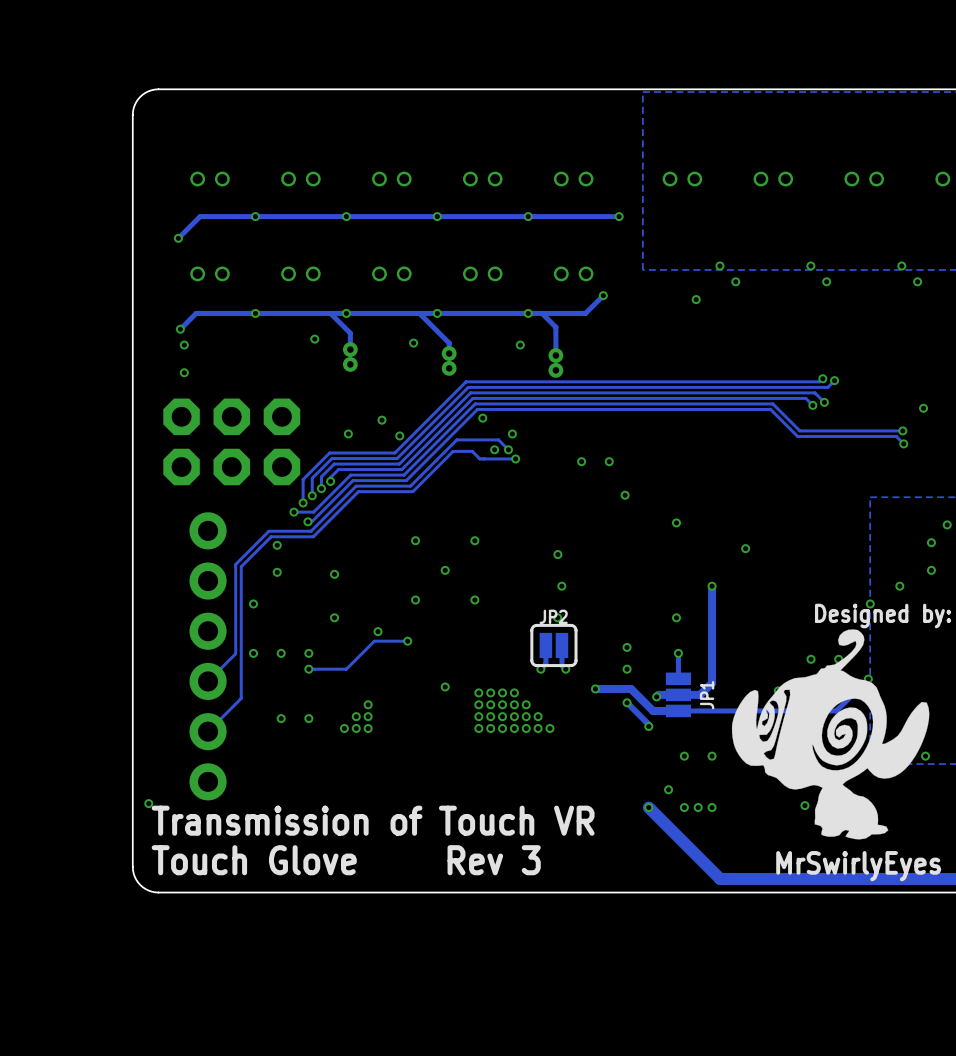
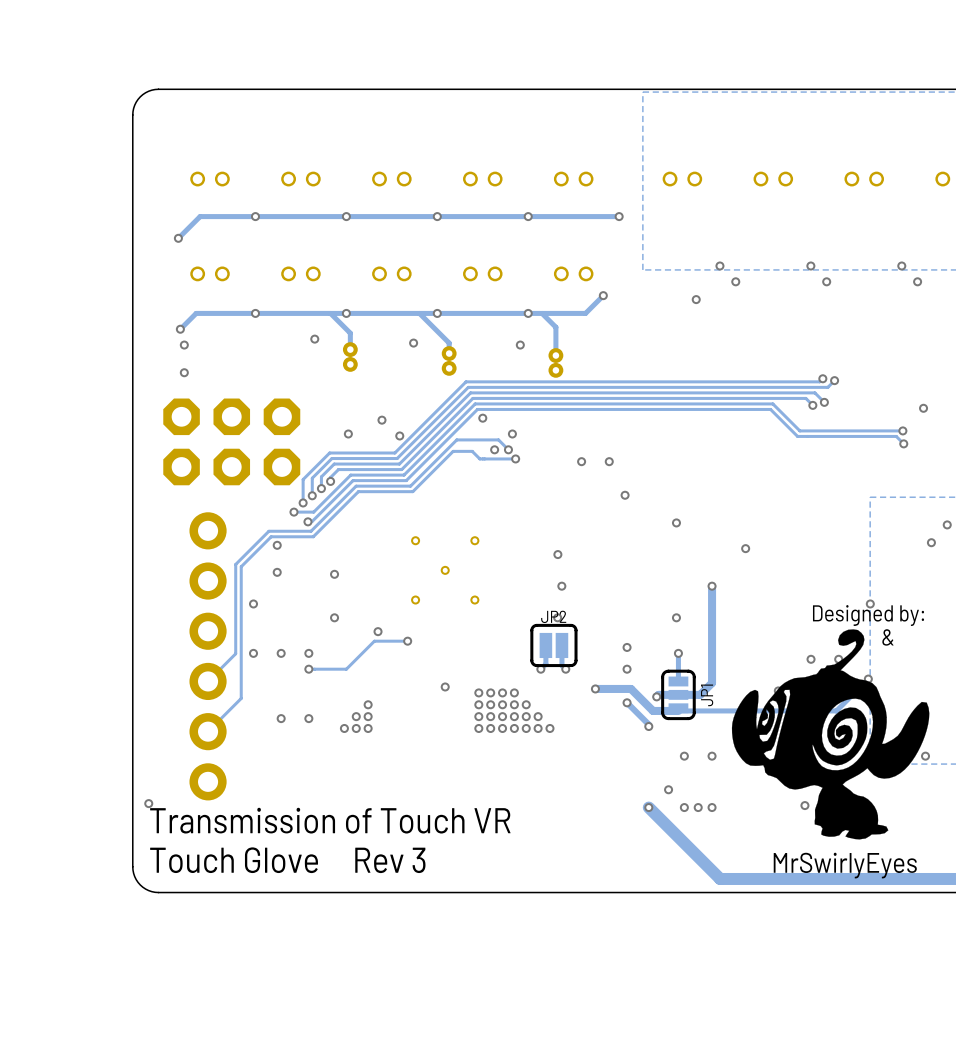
via: (931, 570) -> none
via: (899, 586) -> none
JP1 footprint: [665, 672, 692, 718] -> [661, 669, 696, 721]

